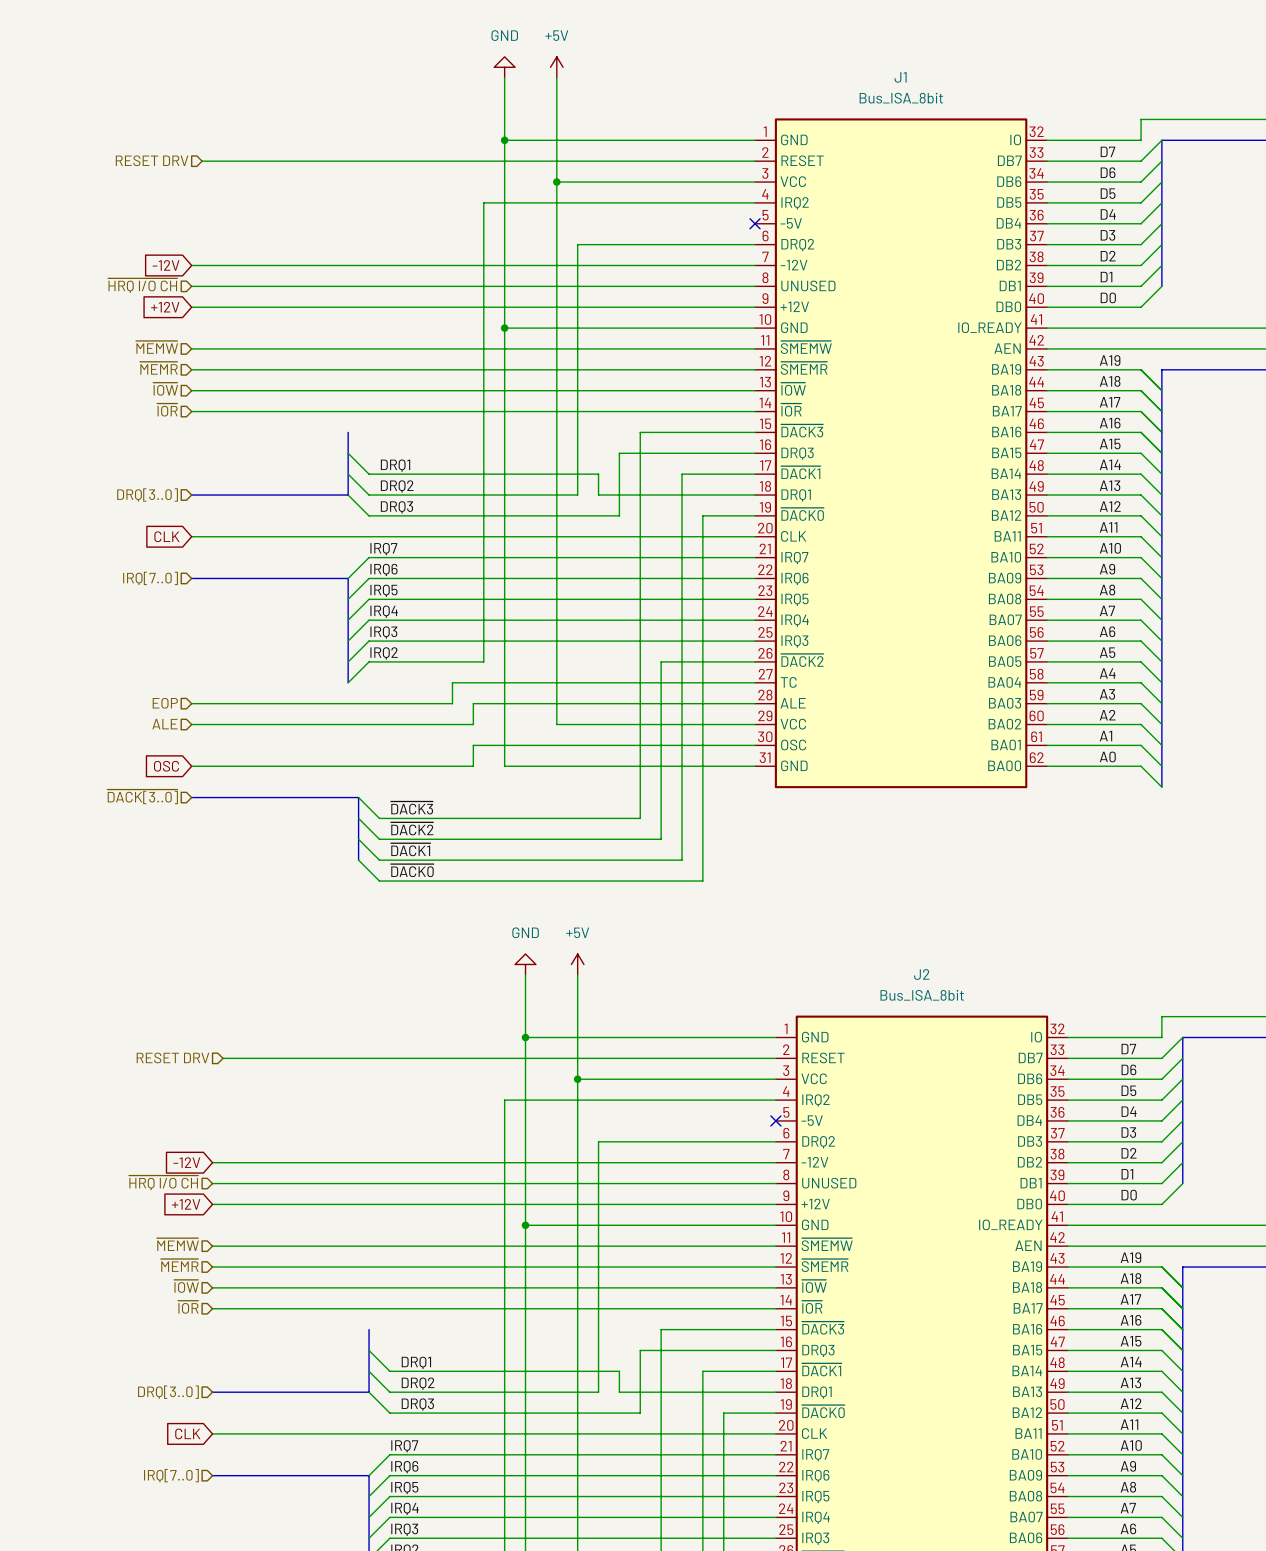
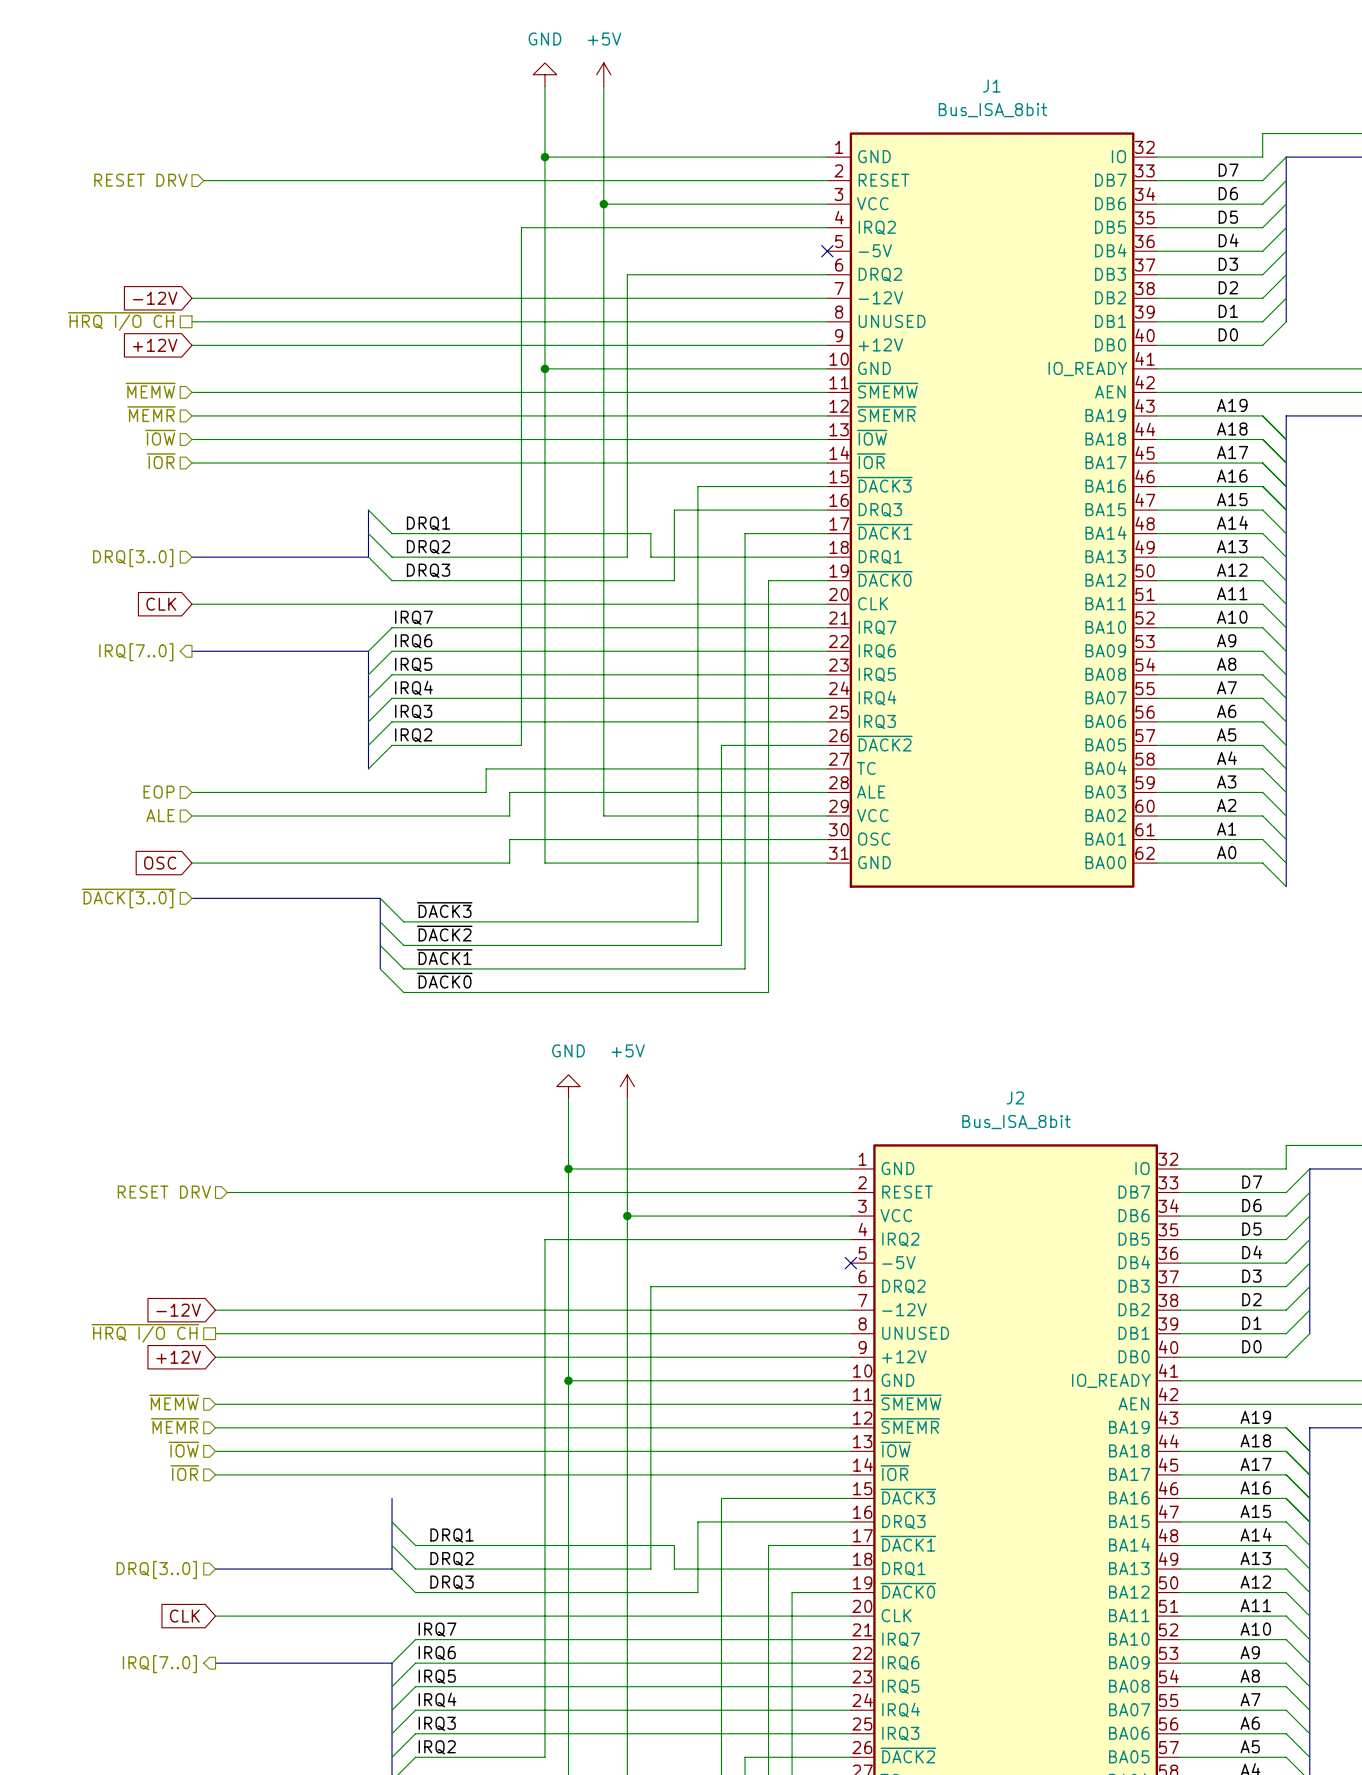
hierarchical label shape: input (142, 285) -> passive (121, 321)
bus: (348, 432) (348, 453) -> none
hierarchical label shape: input (150, 578) -> output (136, 652)
hierarchical label shape: input (163, 1182) -> passive (145, 1333)
hierarchical label shape: input (171, 1475) -> output (159, 1664)

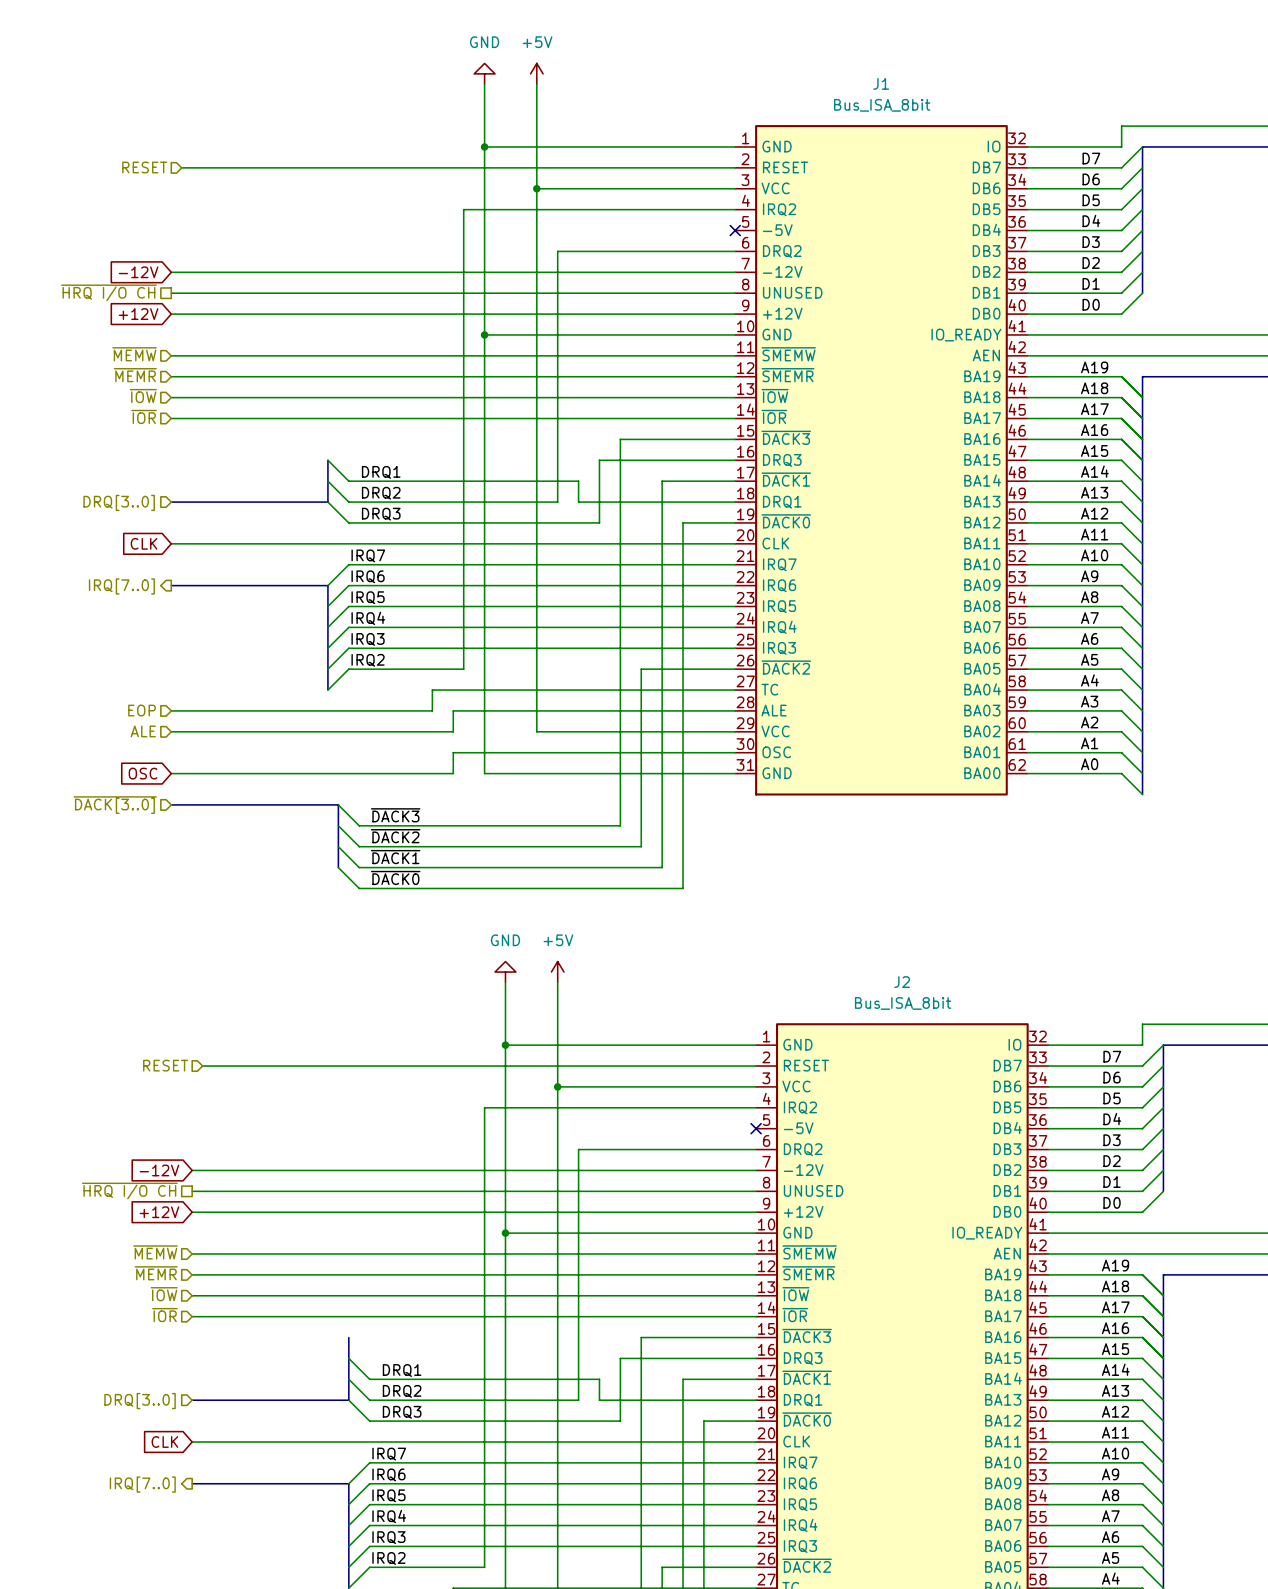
hierarchical label: RESET DRV (140, 180) -> RESET (144, 167)
hierarchical label: RESET DRV (164, 1192) -> RESET (165, 1065)

